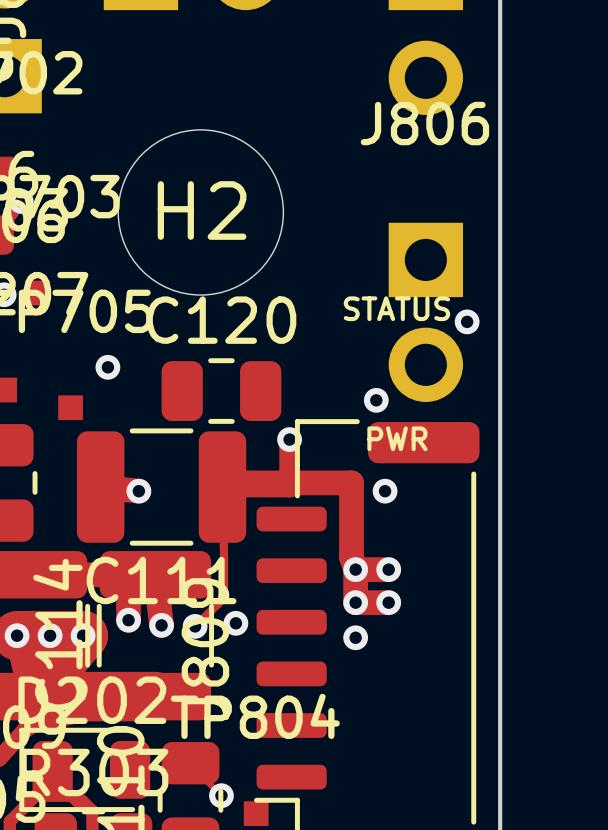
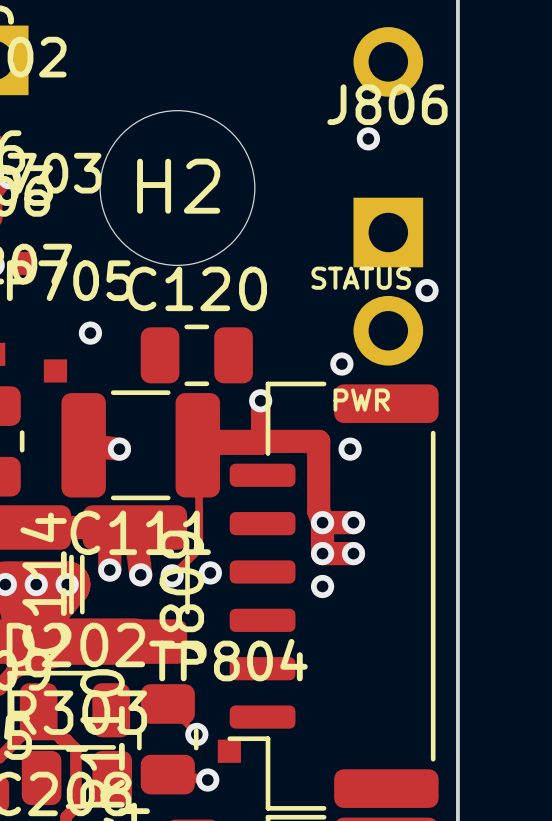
via: none -> (368, 138)

